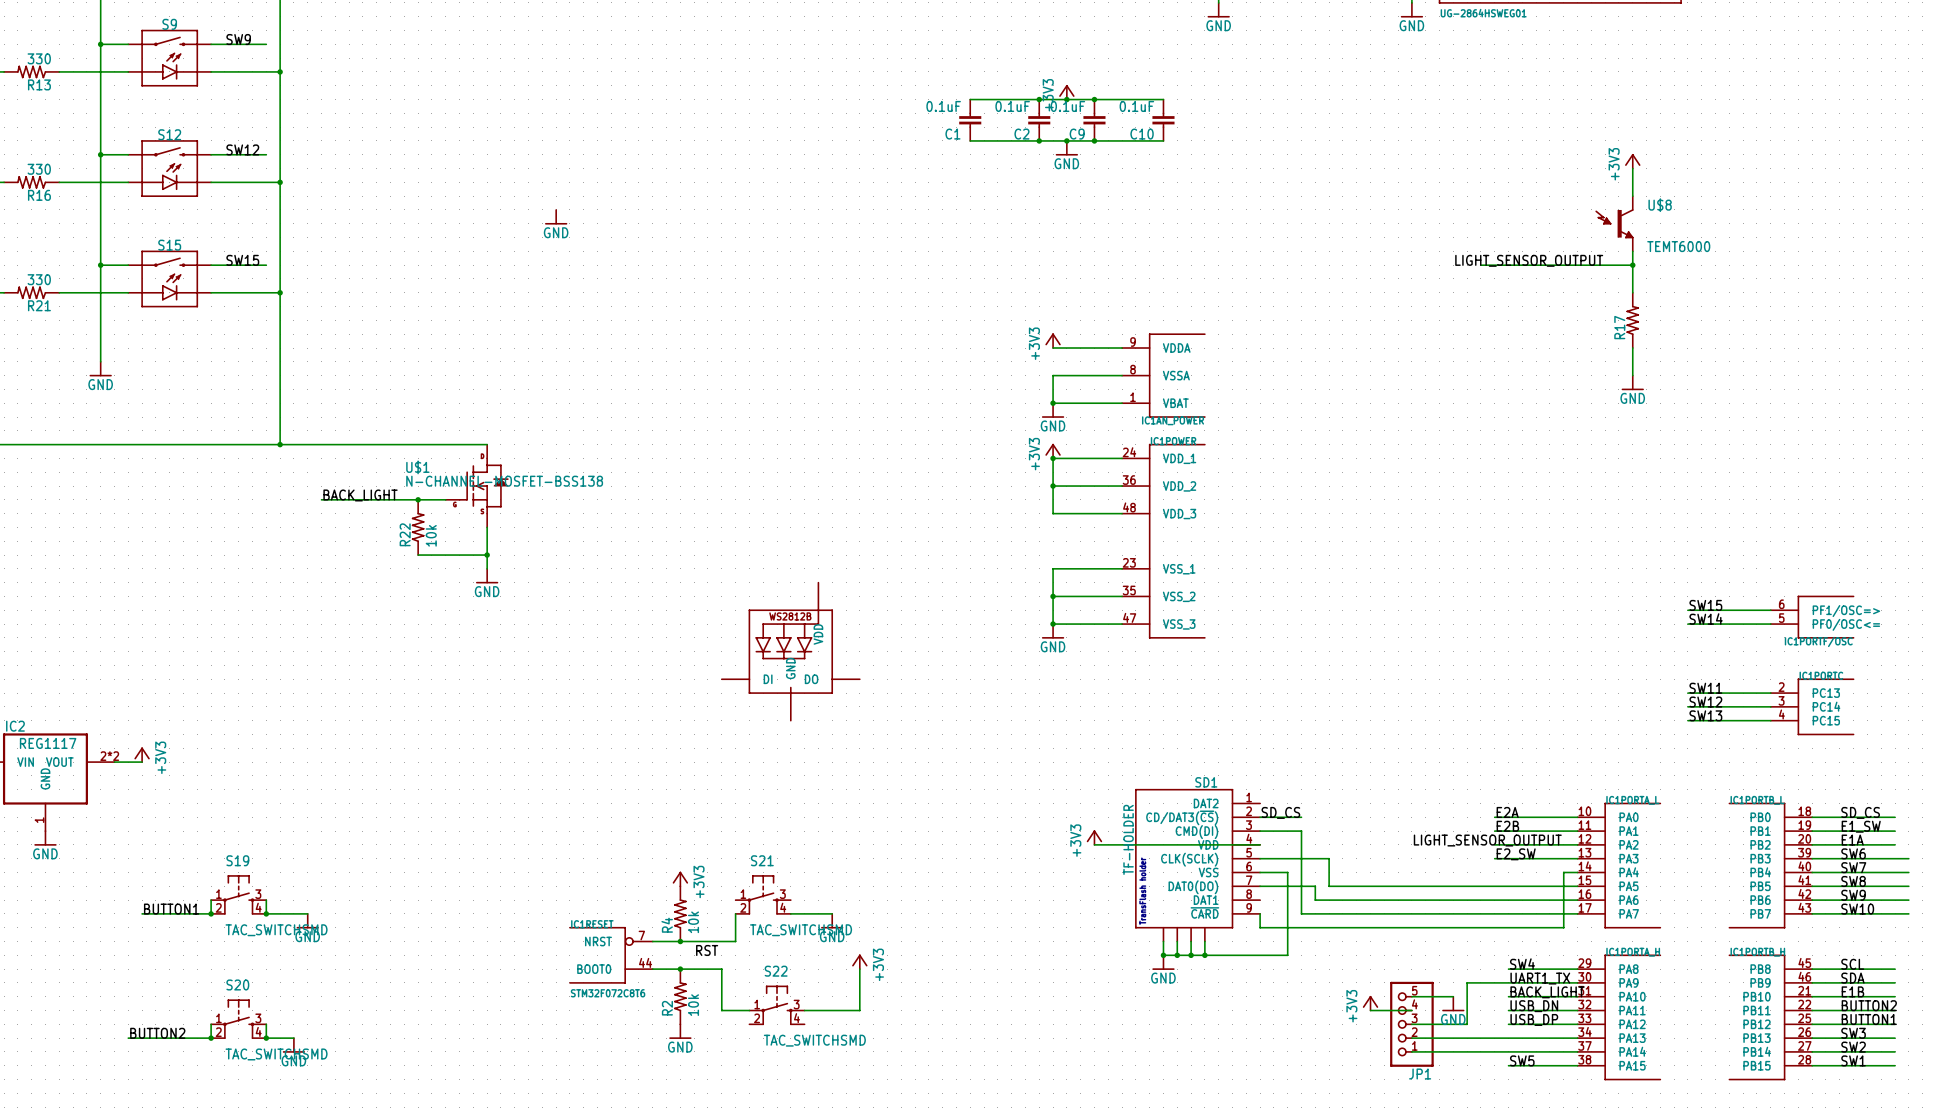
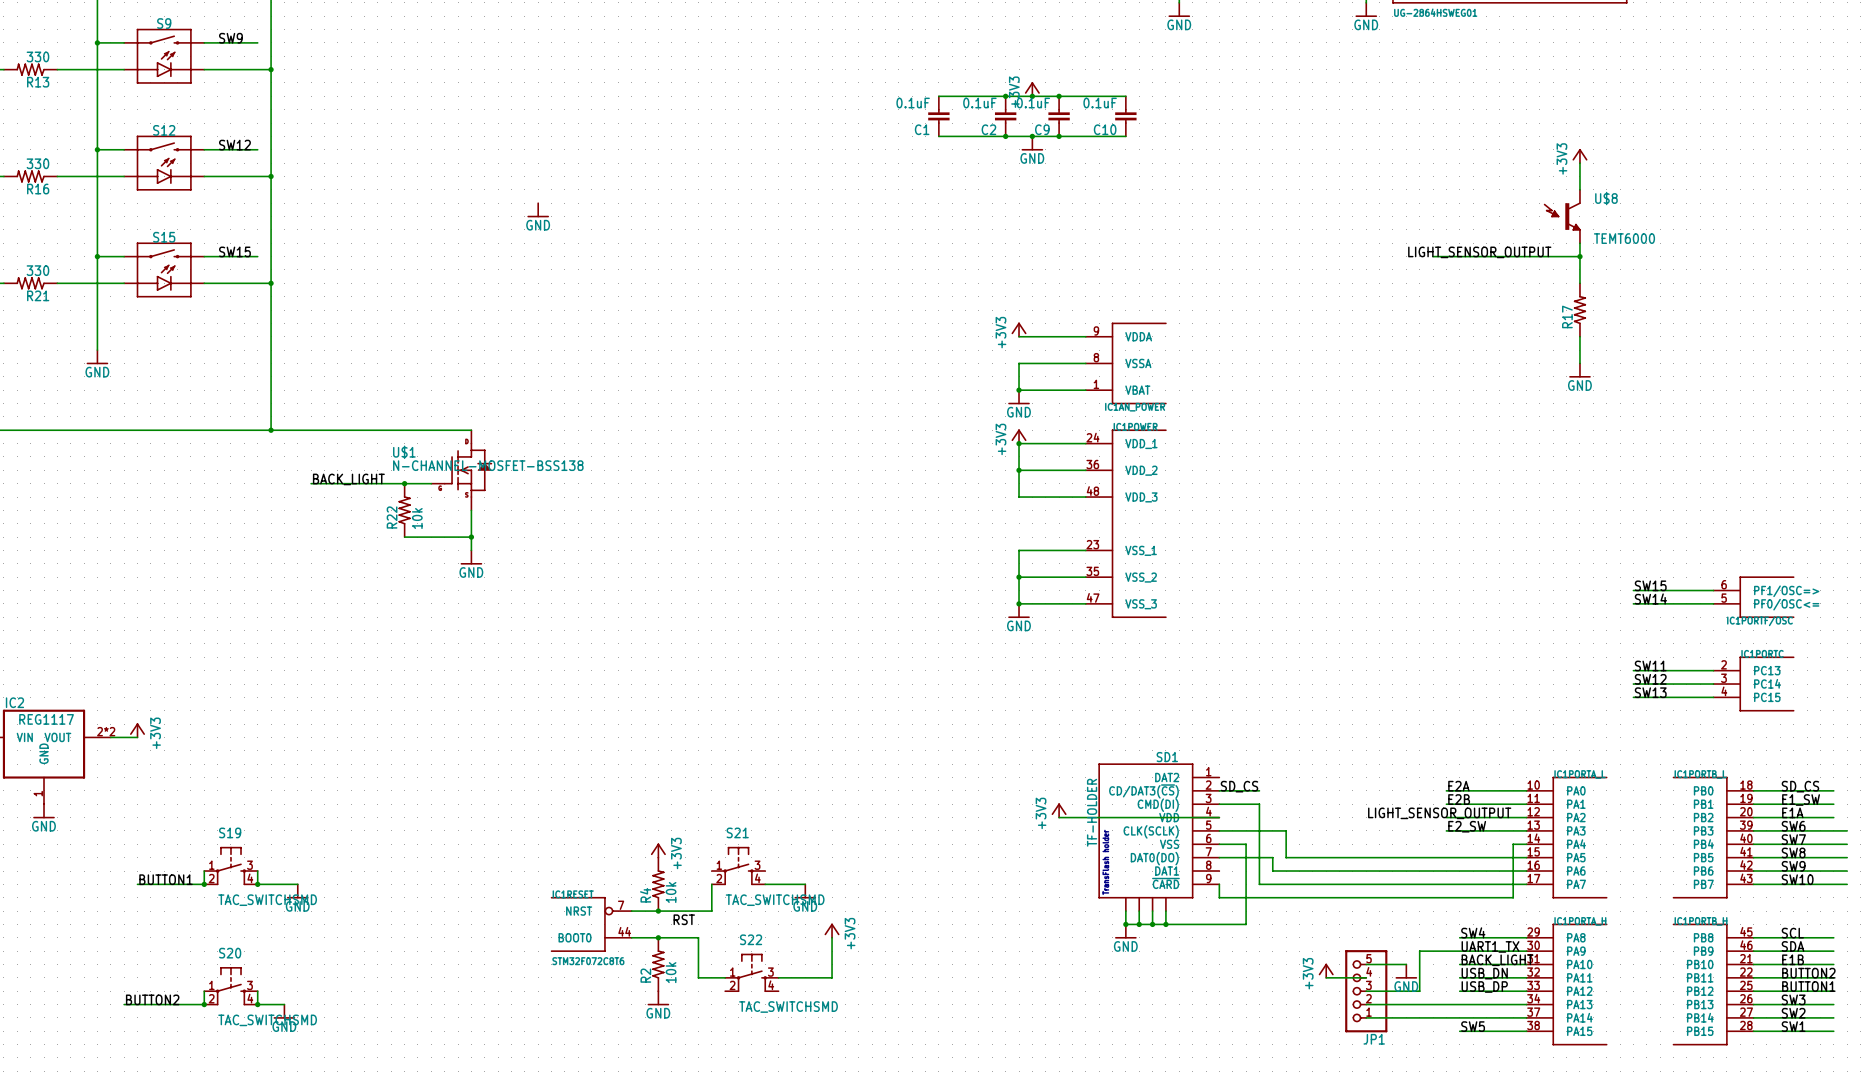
part: (790, 651) -> none

